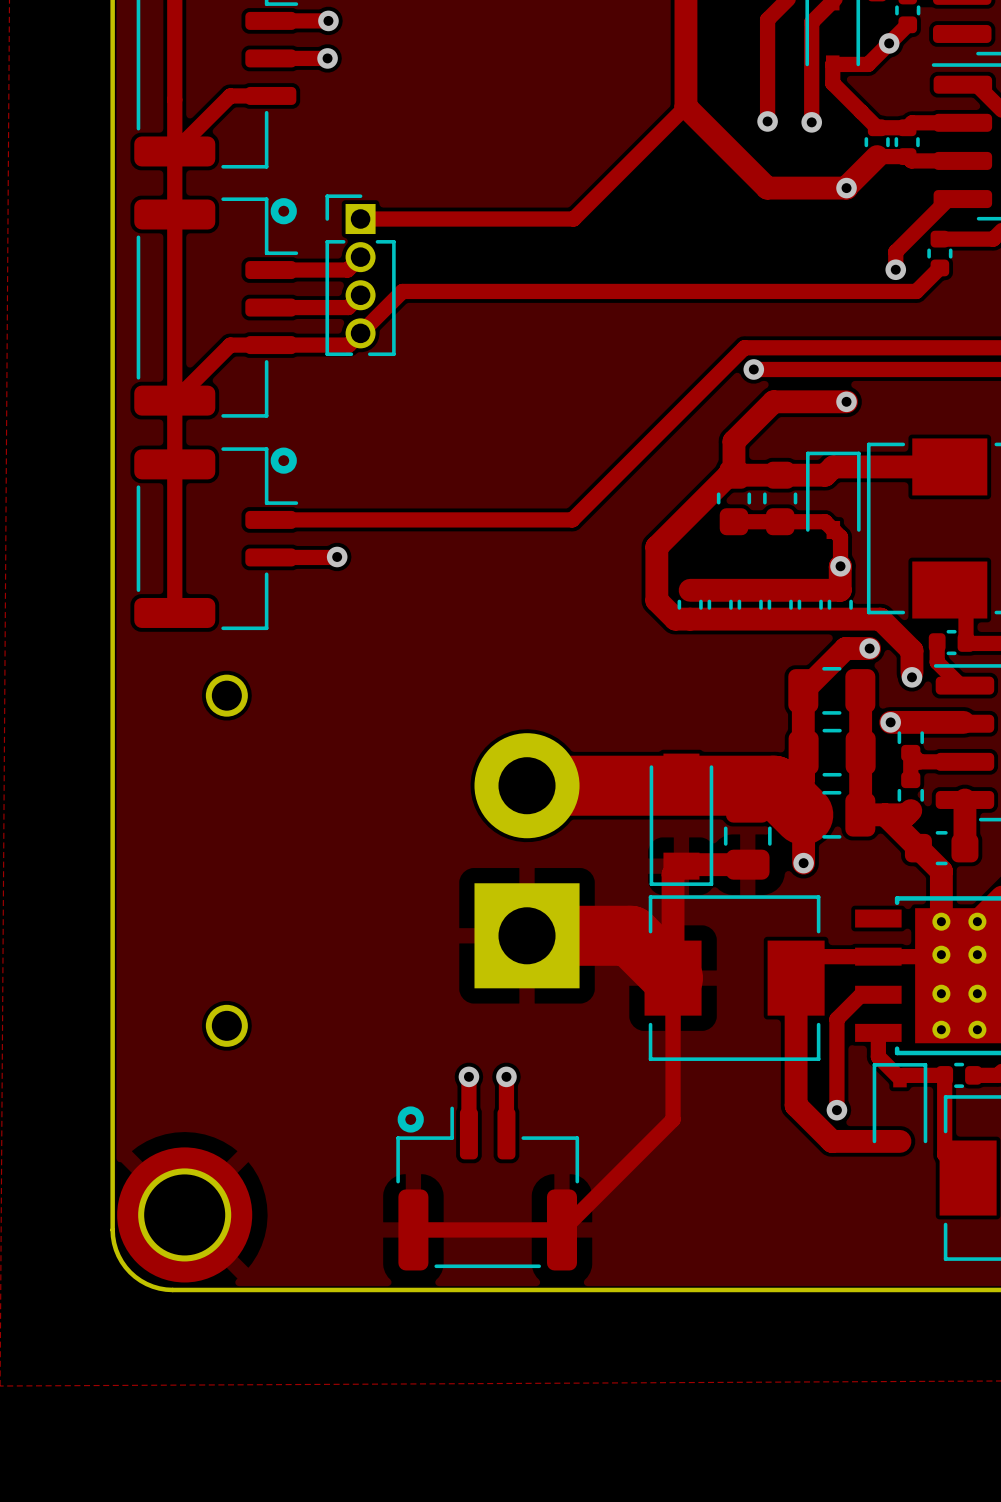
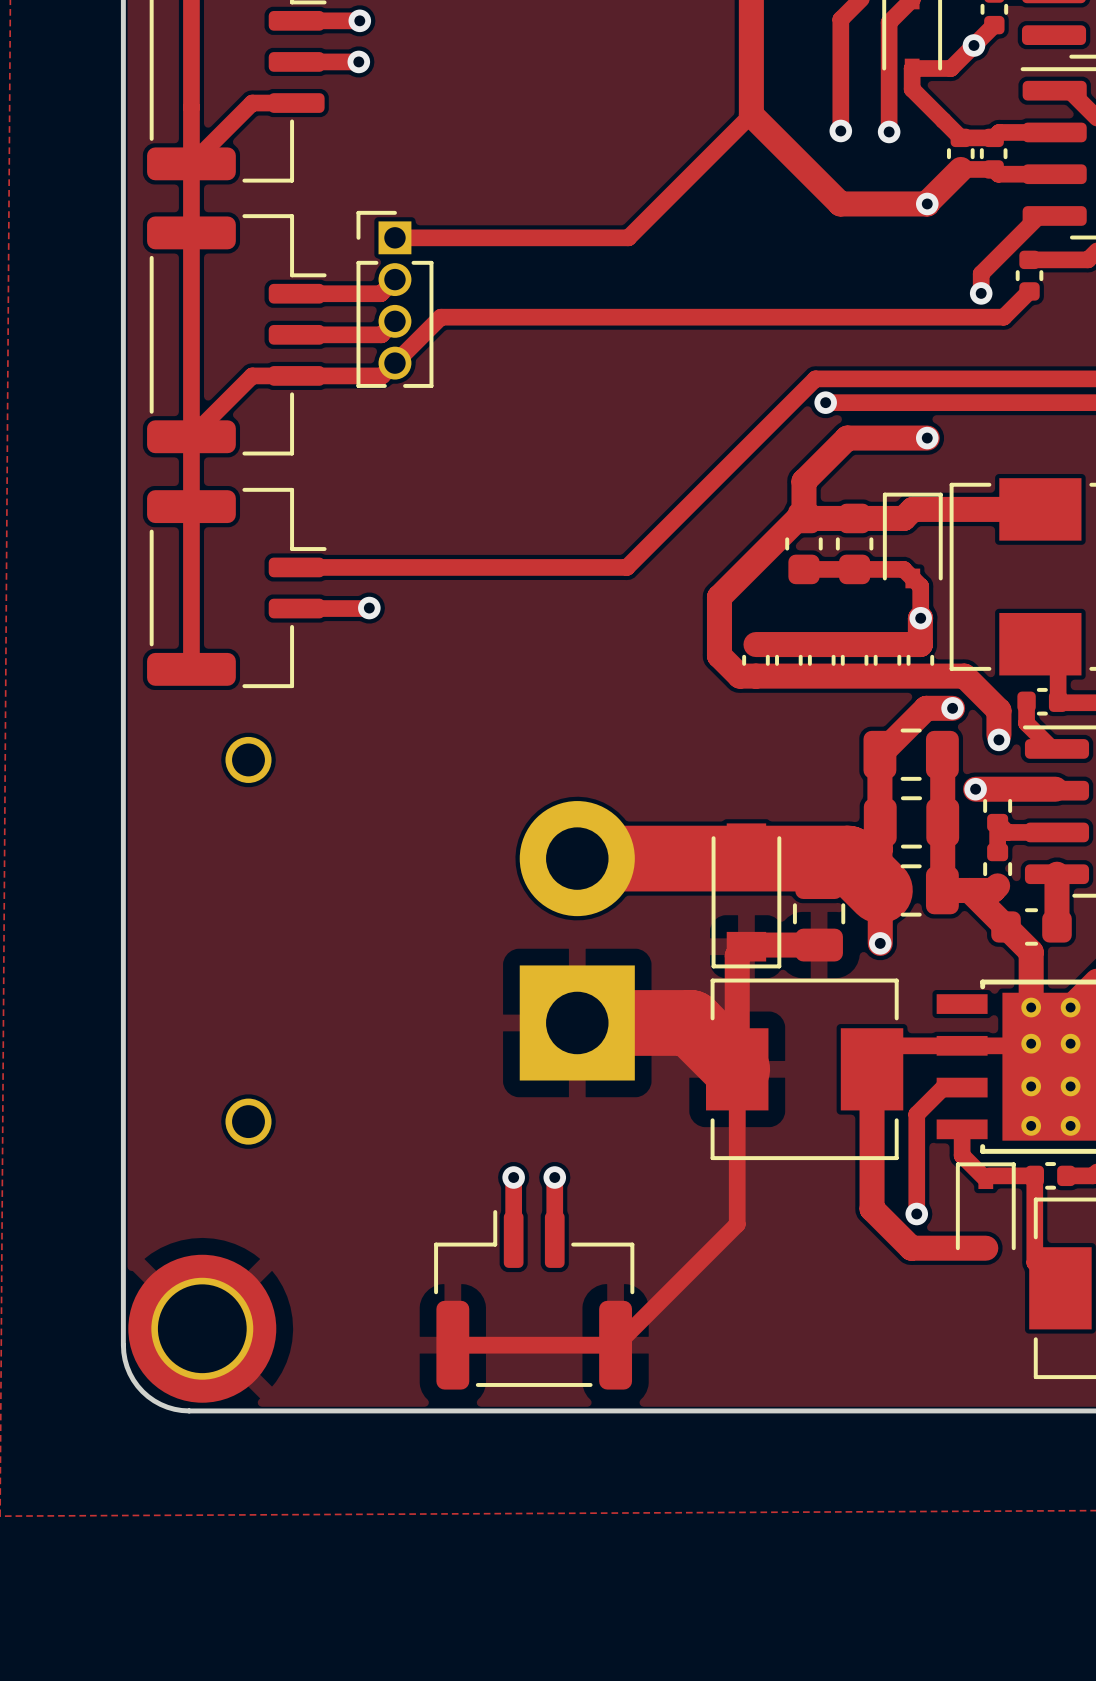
drawing: [270, 198, 297, 225] -> none
drawing: [270, 447, 297, 474] -> none
drawing: [397, 1106, 424, 1133] -> none

